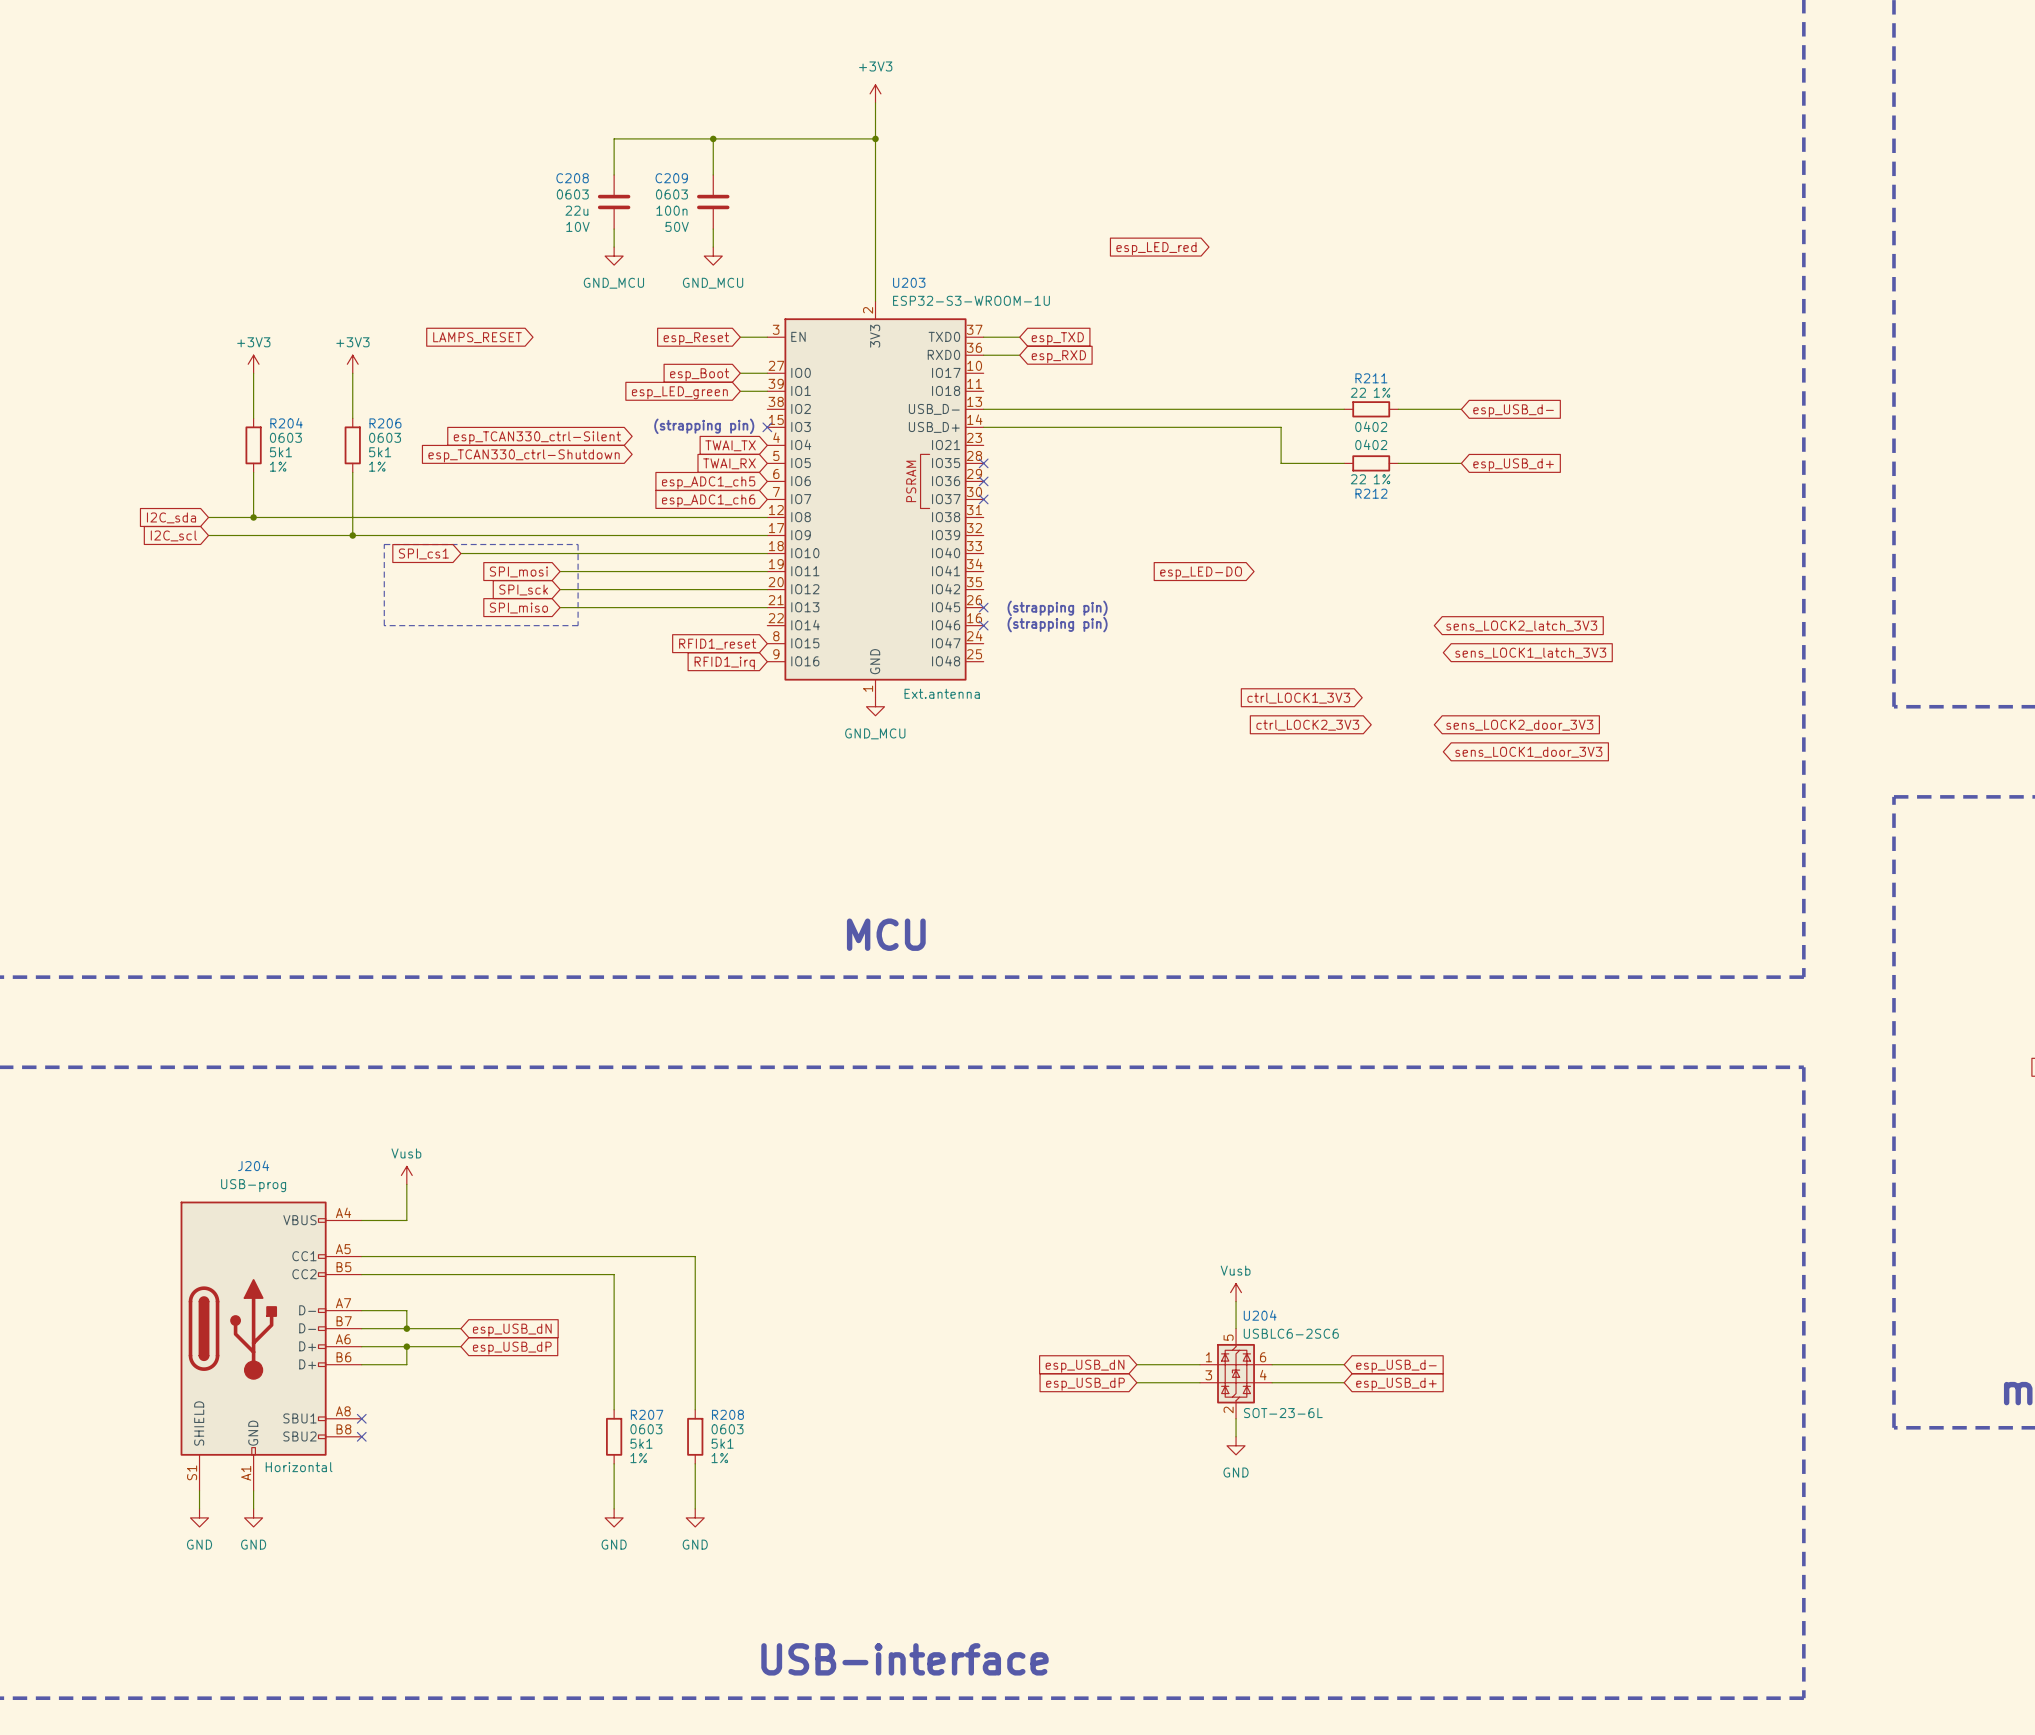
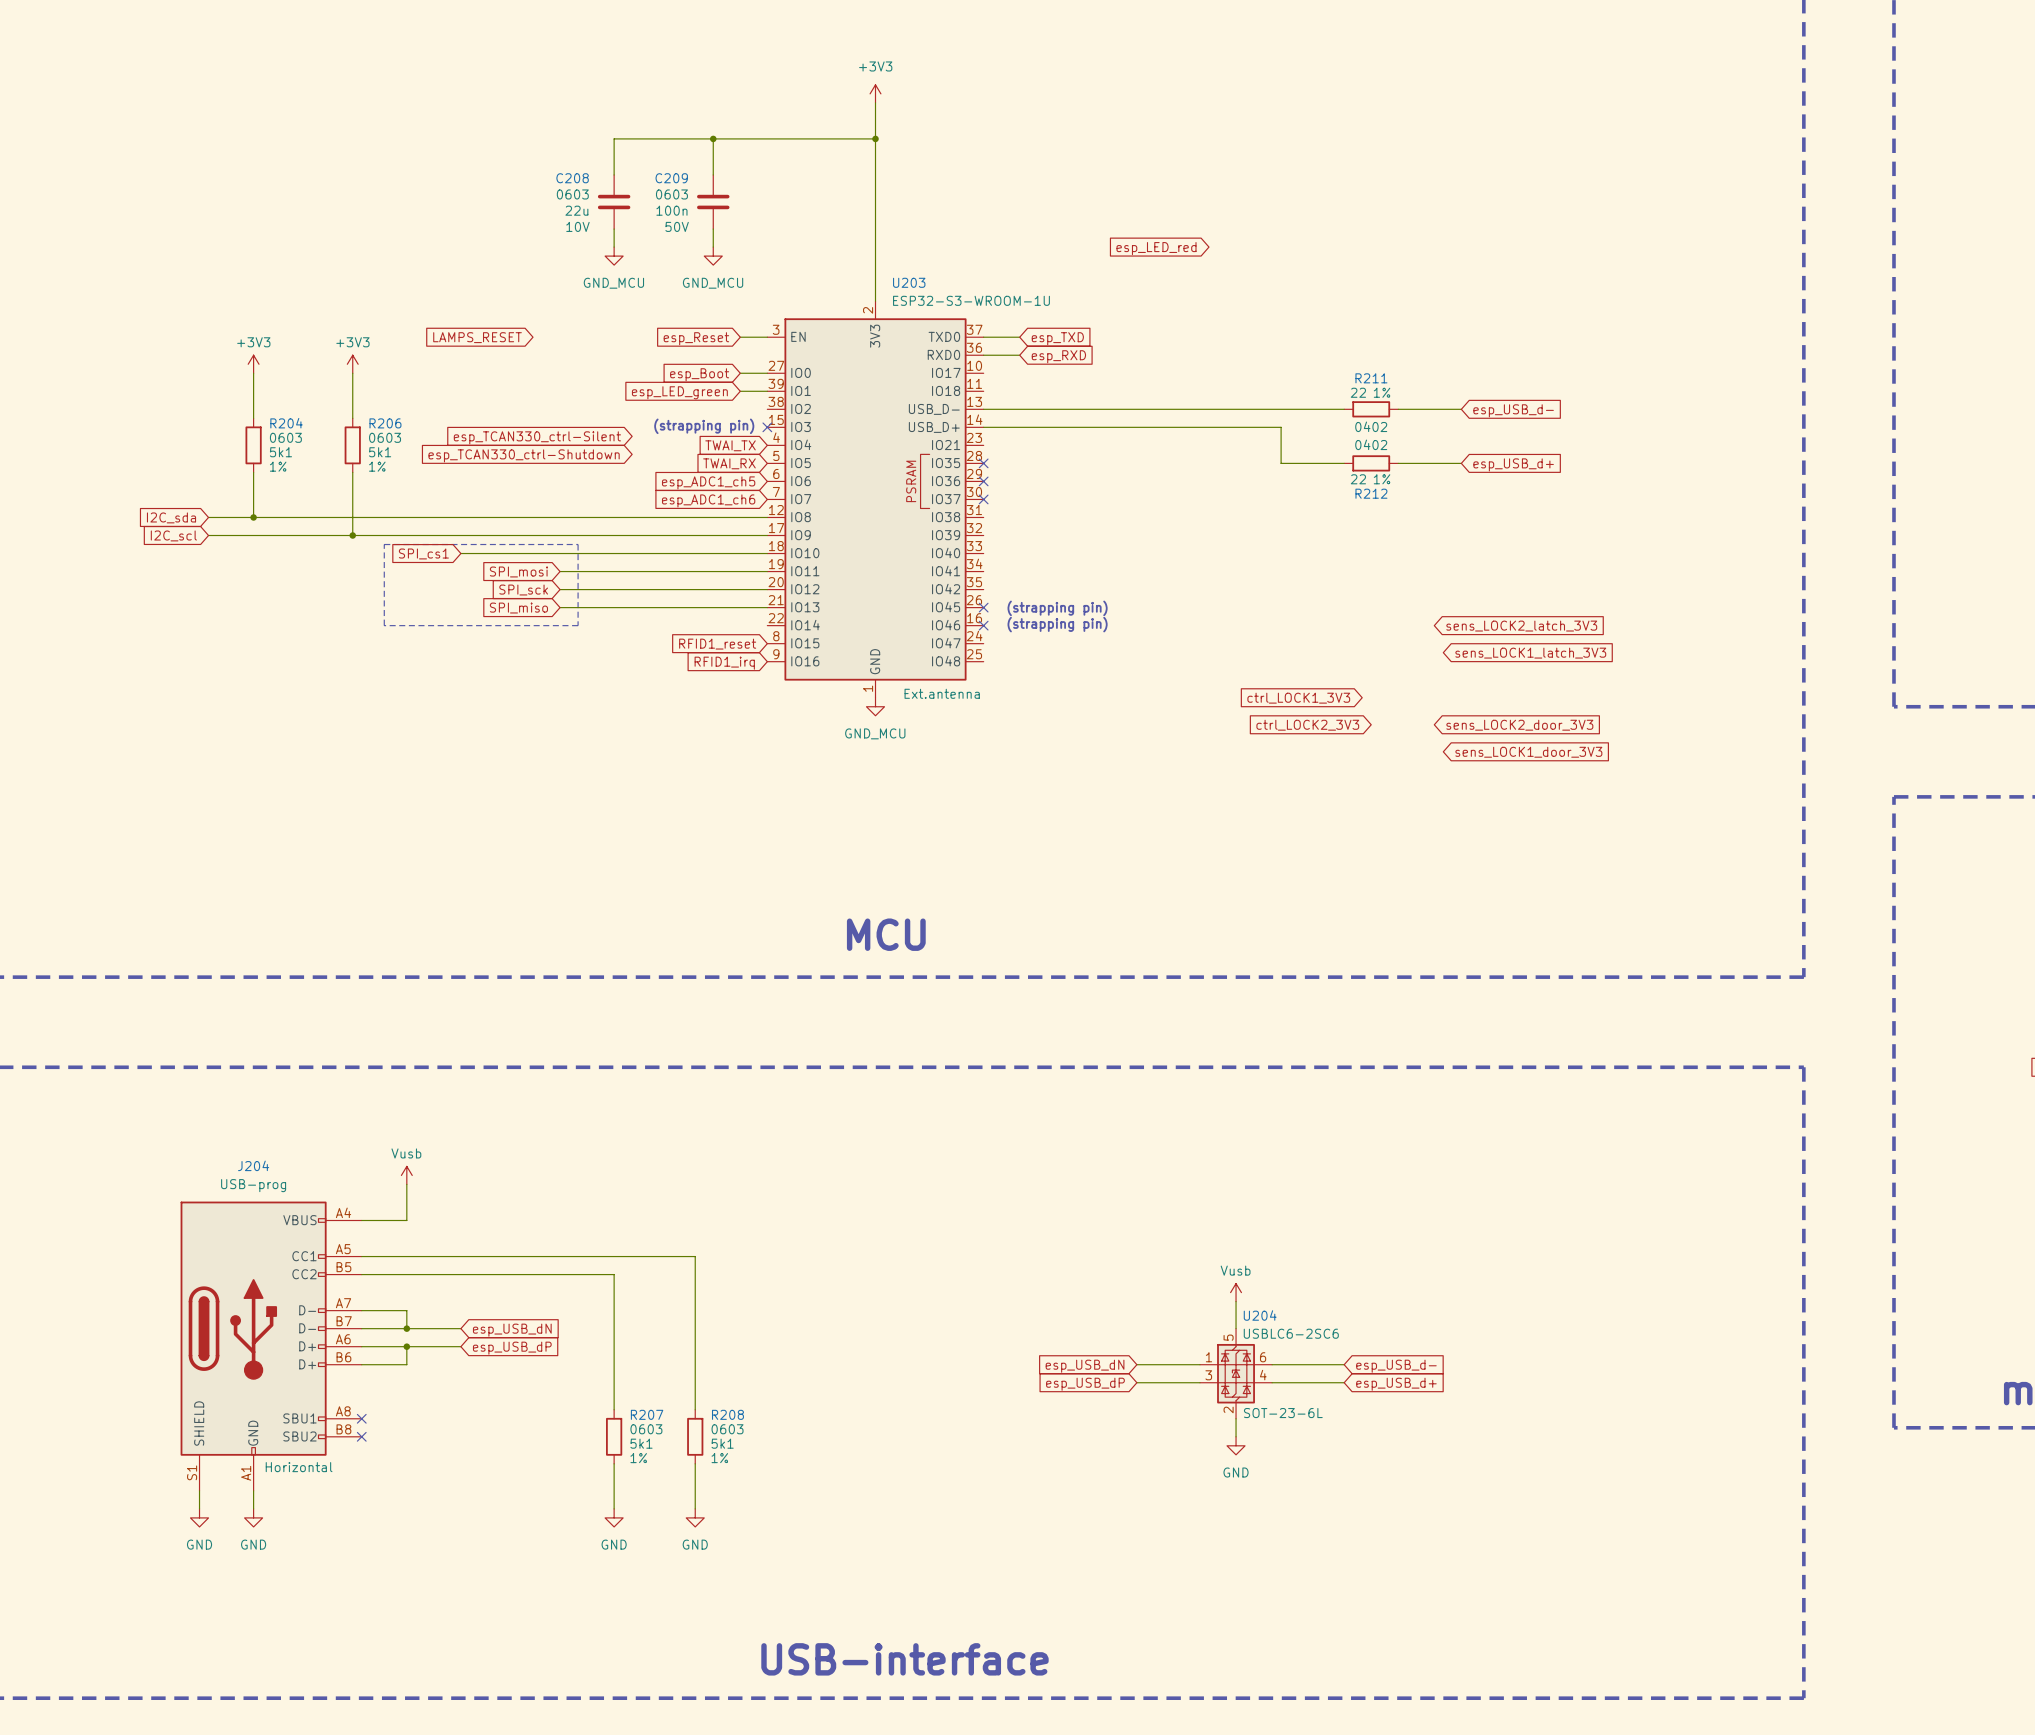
global label: esp_LED-DO (1201, 573) -> none

